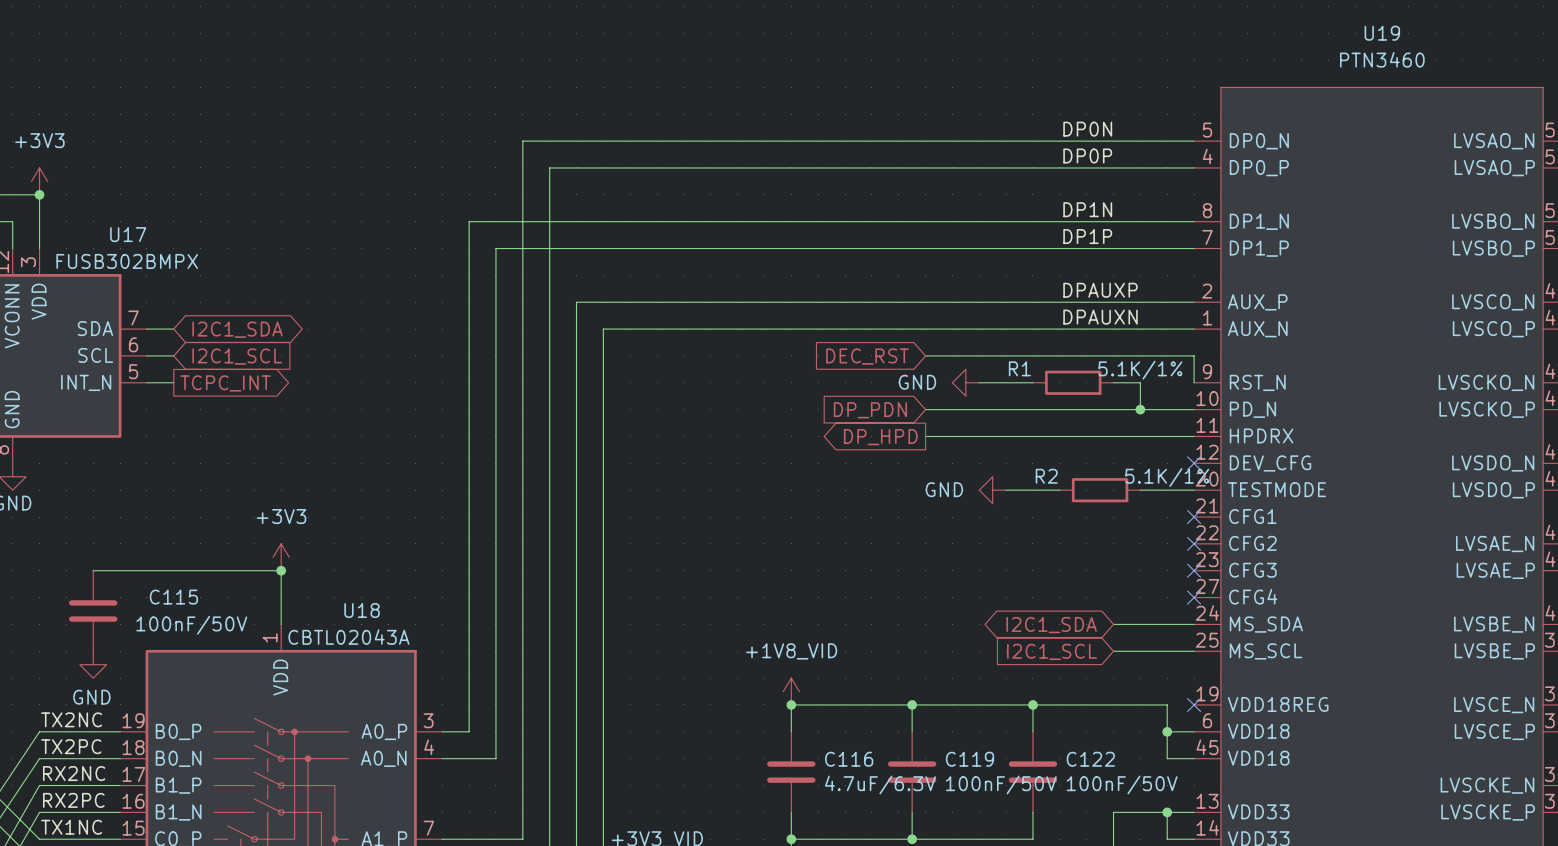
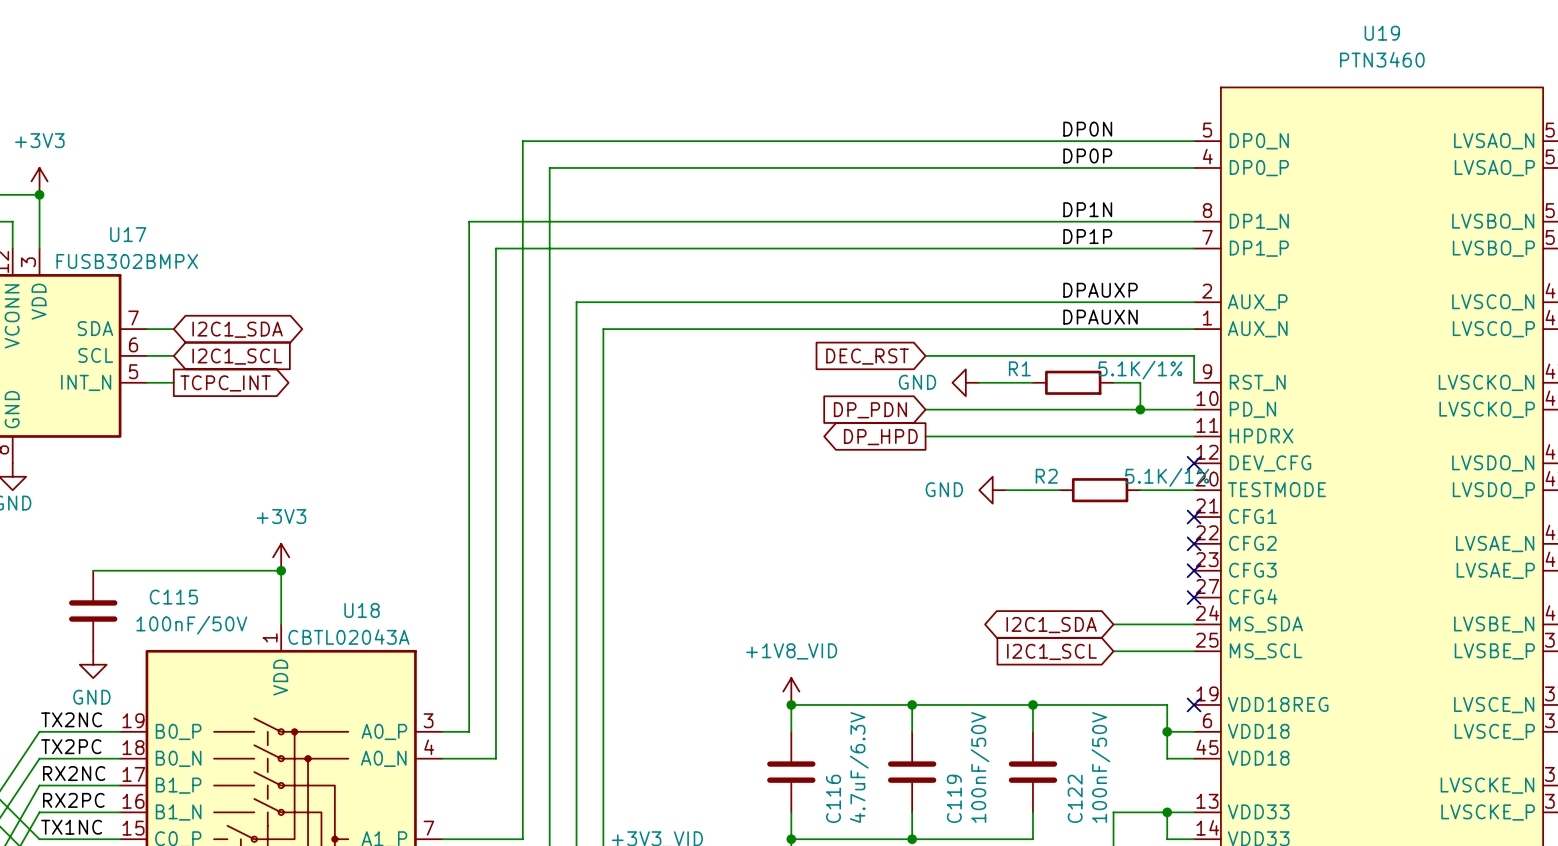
C116 name rotation: 0° (849, 759) -> 90° counterclockwise (833, 798)
C119 name rotation: 0° (969, 759) -> 90° counterclockwise (954, 798)
C122 name rotation: 0° (1090, 759) -> 90° counterclockwise (1075, 798)
C116 value rotation: 0° (880, 784) -> 90° counterclockwise (859, 767)
C119 value rotation: 0° (1001, 784) -> 90° counterclockwise (980, 767)
C122 value rotation: 0° (1122, 784) -> 90° counterclockwise (1100, 767)

